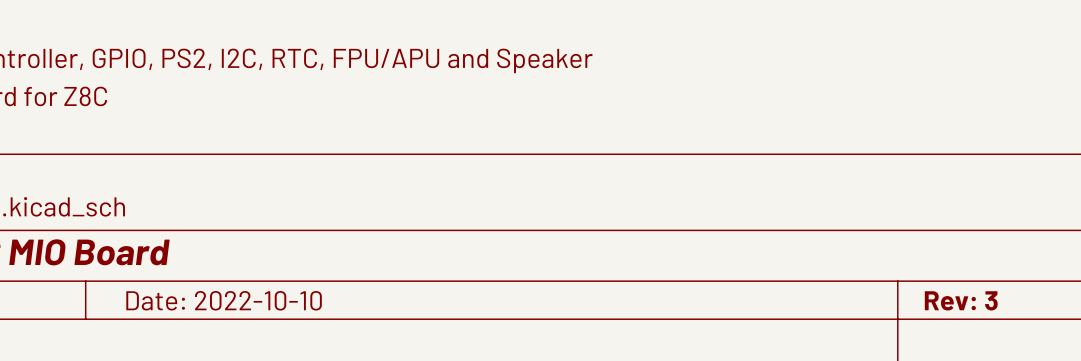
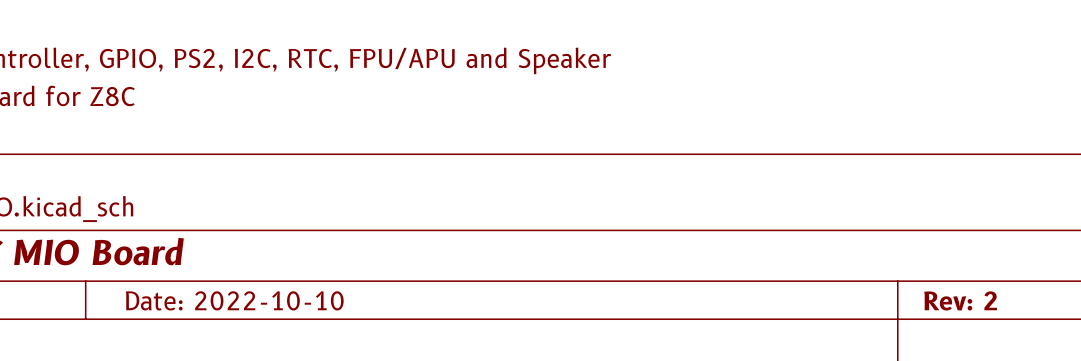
title block: Rev: 3 (961, 300) -> Rev: 2 (960, 300)

